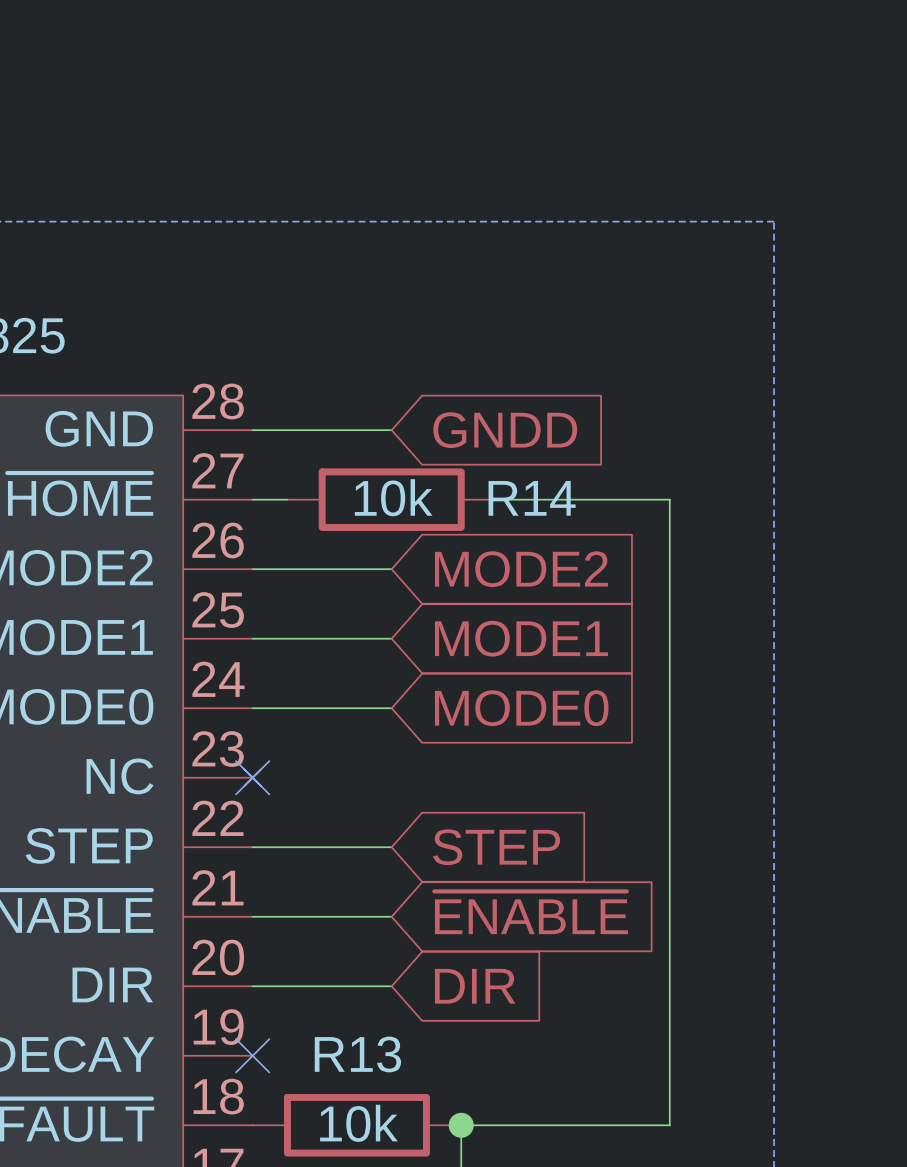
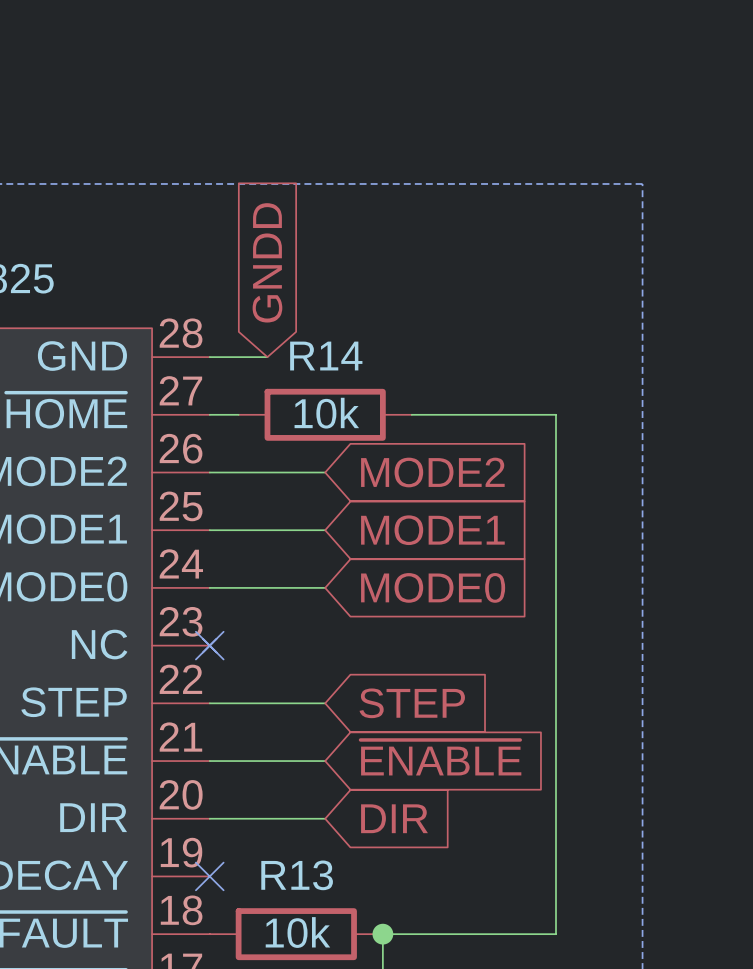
wire: (322, 430) (391, 430) -> none
global label rotation: 0° (505, 430) -> 90° counterclockwise (267, 262)
R14 name position: R14 (532, 498) -> R14 (326, 356)

